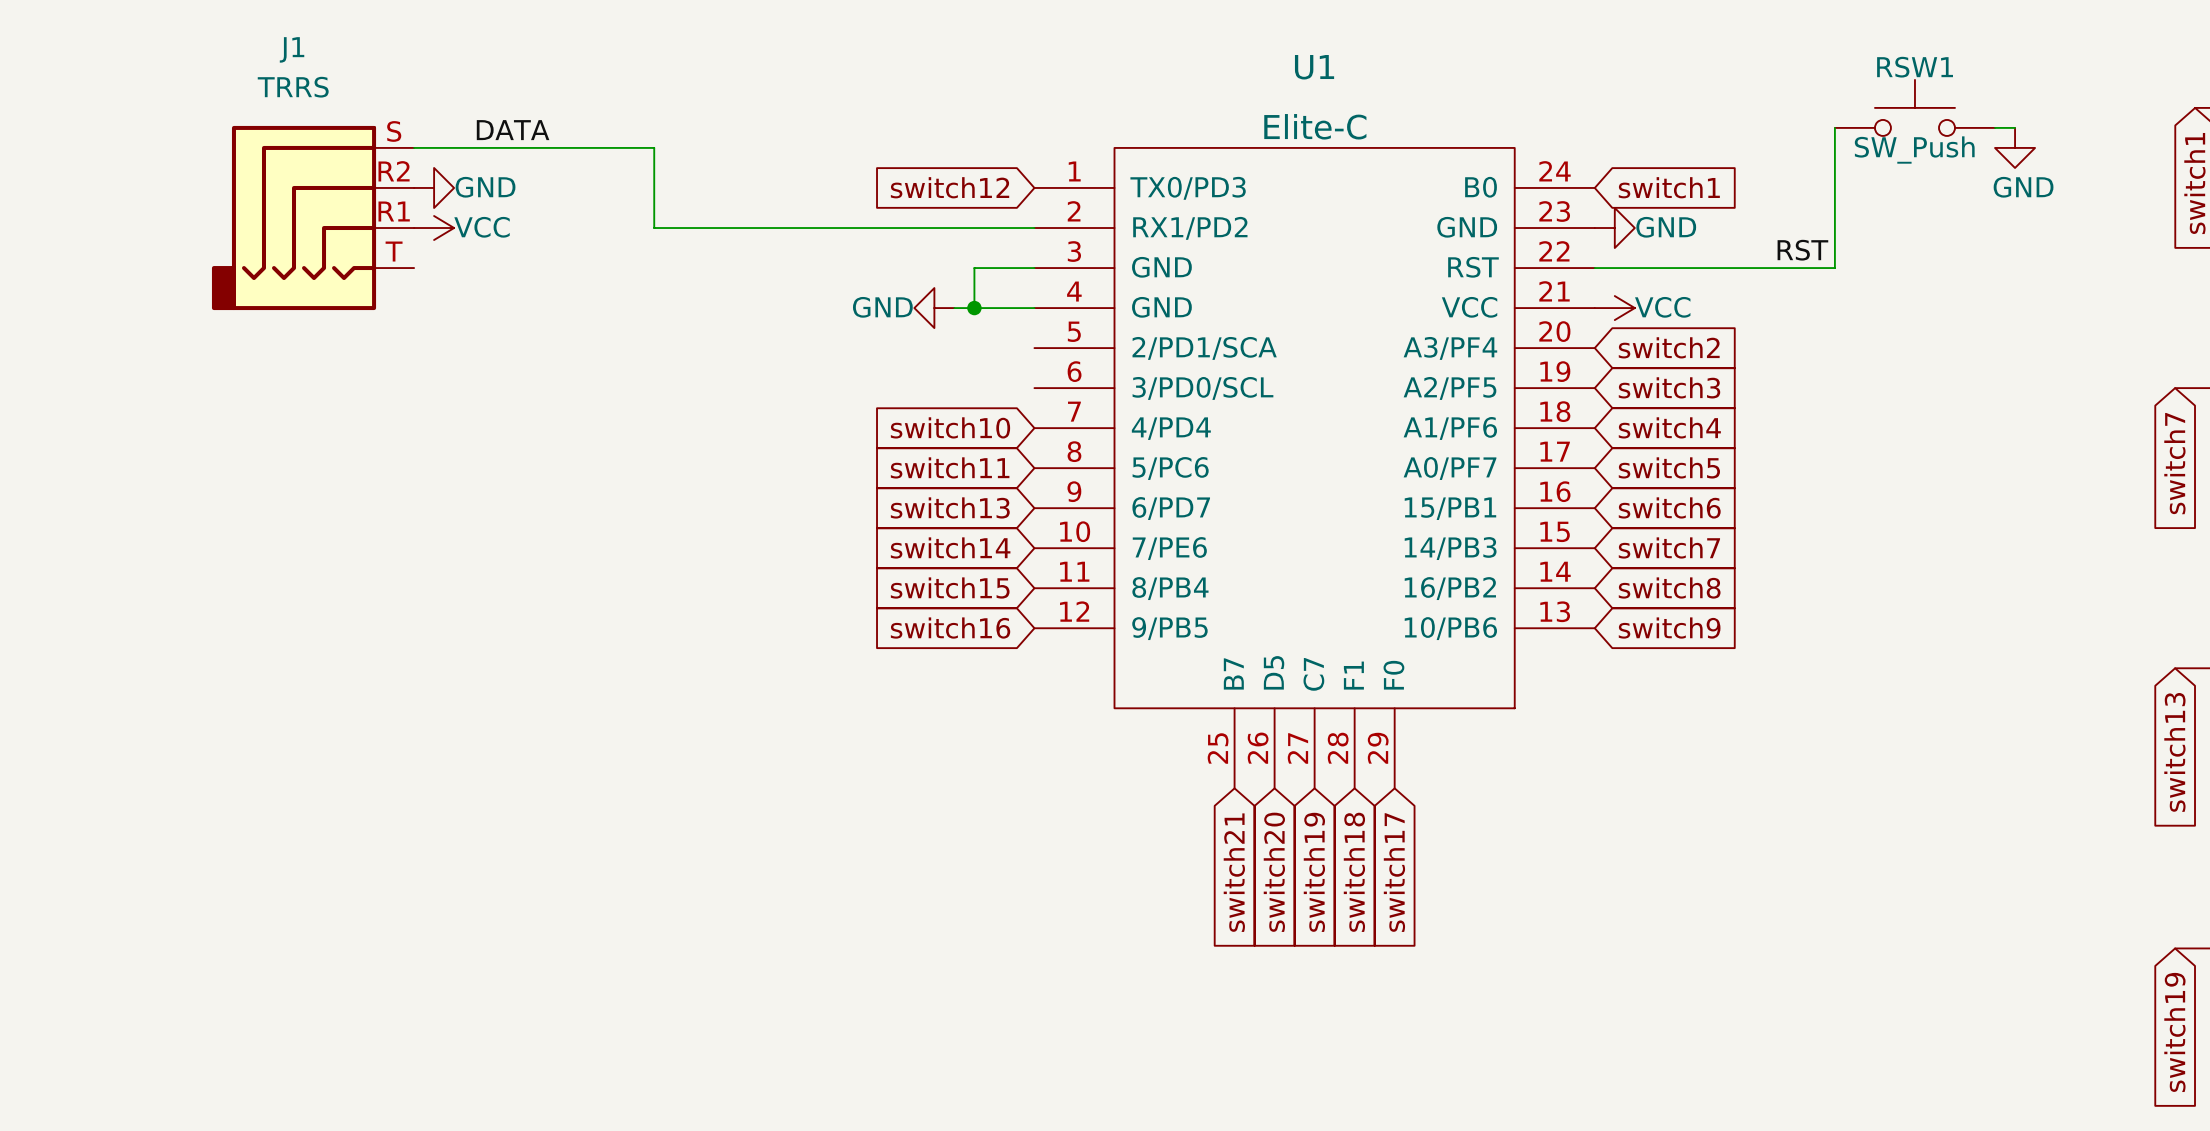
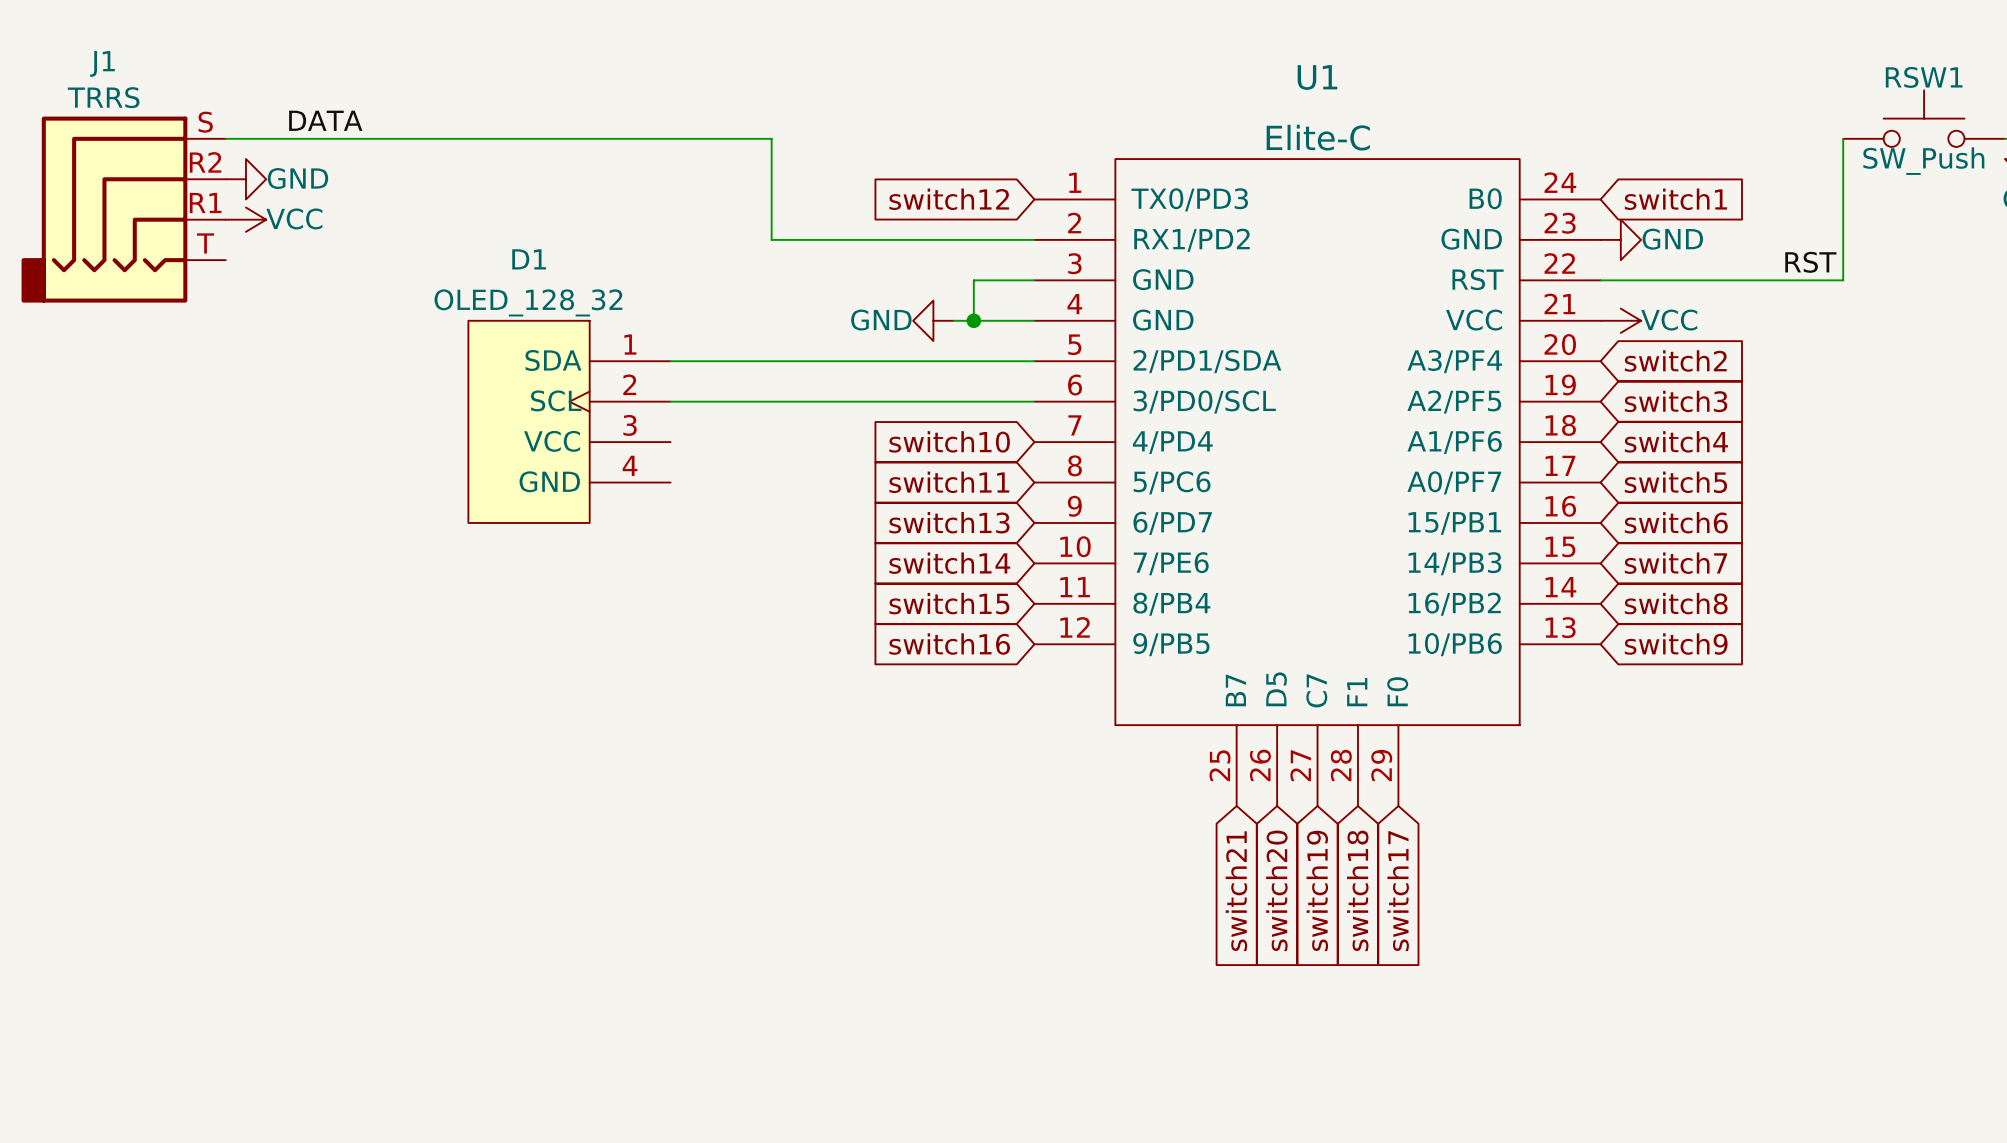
J1 name position: J1 (292, 49) -> J1 (102, 63)
J1 value position: TRRS (293, 87) -> TRRS (103, 97)
label position: DATA (513, 130) -> DATA (325, 120)
wire: (414, 147) (654, 147) (654, 228) (774, 228) -> (225, 138) (771, 138) (771, 239)
power symbol position: GND (434, 187) -> GND (245, 179)
J1 position: (313, 218) -> (123, 209)
power symbol position: VCC (434, 228) -> VCC (245, 219)
wire: none -> (670, 361) (1034, 361)
U1 pin name: 2/PD1/SCA (1204, 348) -> 2/PD1/SDA (1207, 361)
D1: none -> OLED_128_32 (417, 381)
wire: none -> (670, 401) (1034, 401)

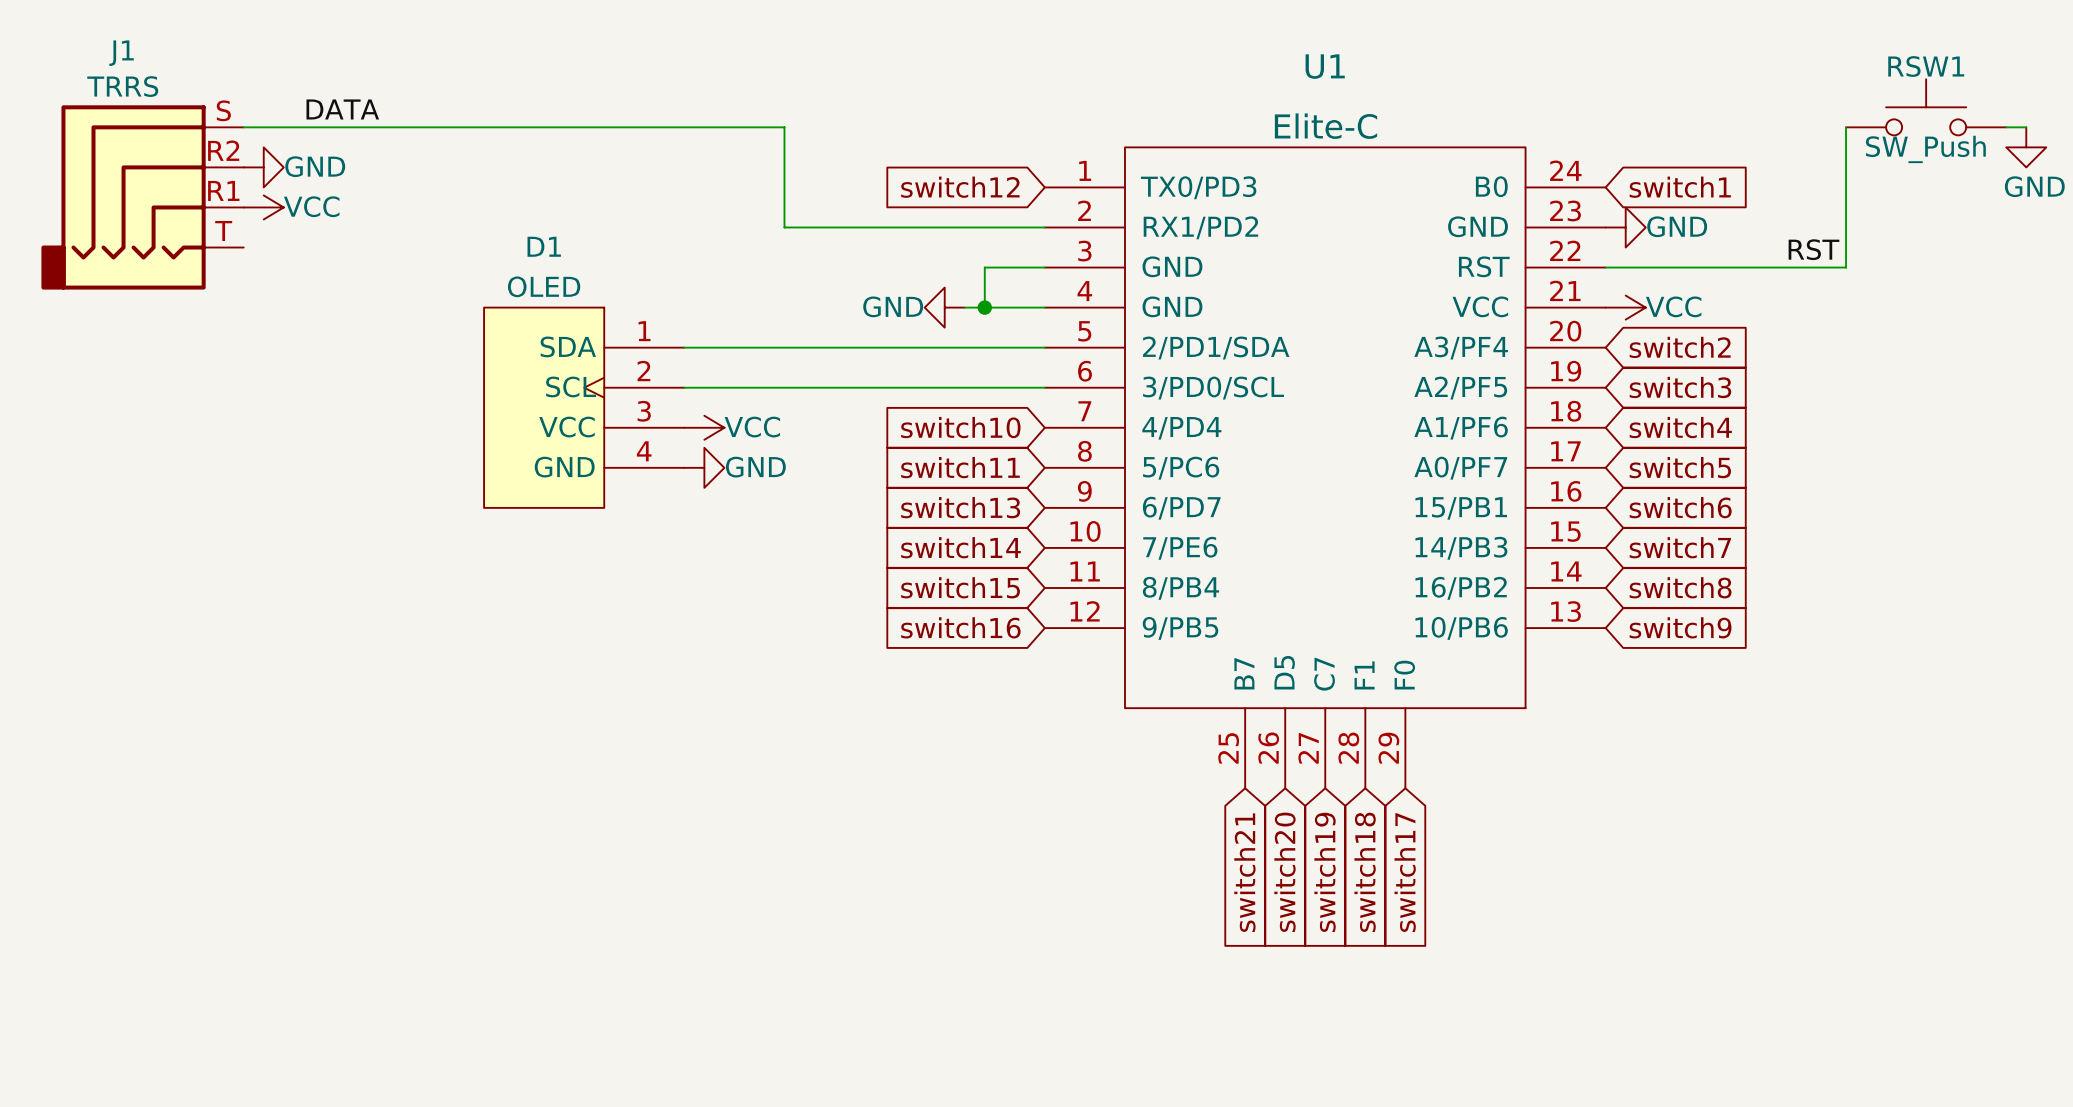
D1 value: OLED_128_32 (528, 302) -> OLED (544, 286)
power symbol: none -> VCC (704, 427)
power symbol: none -> GND (704, 467)

